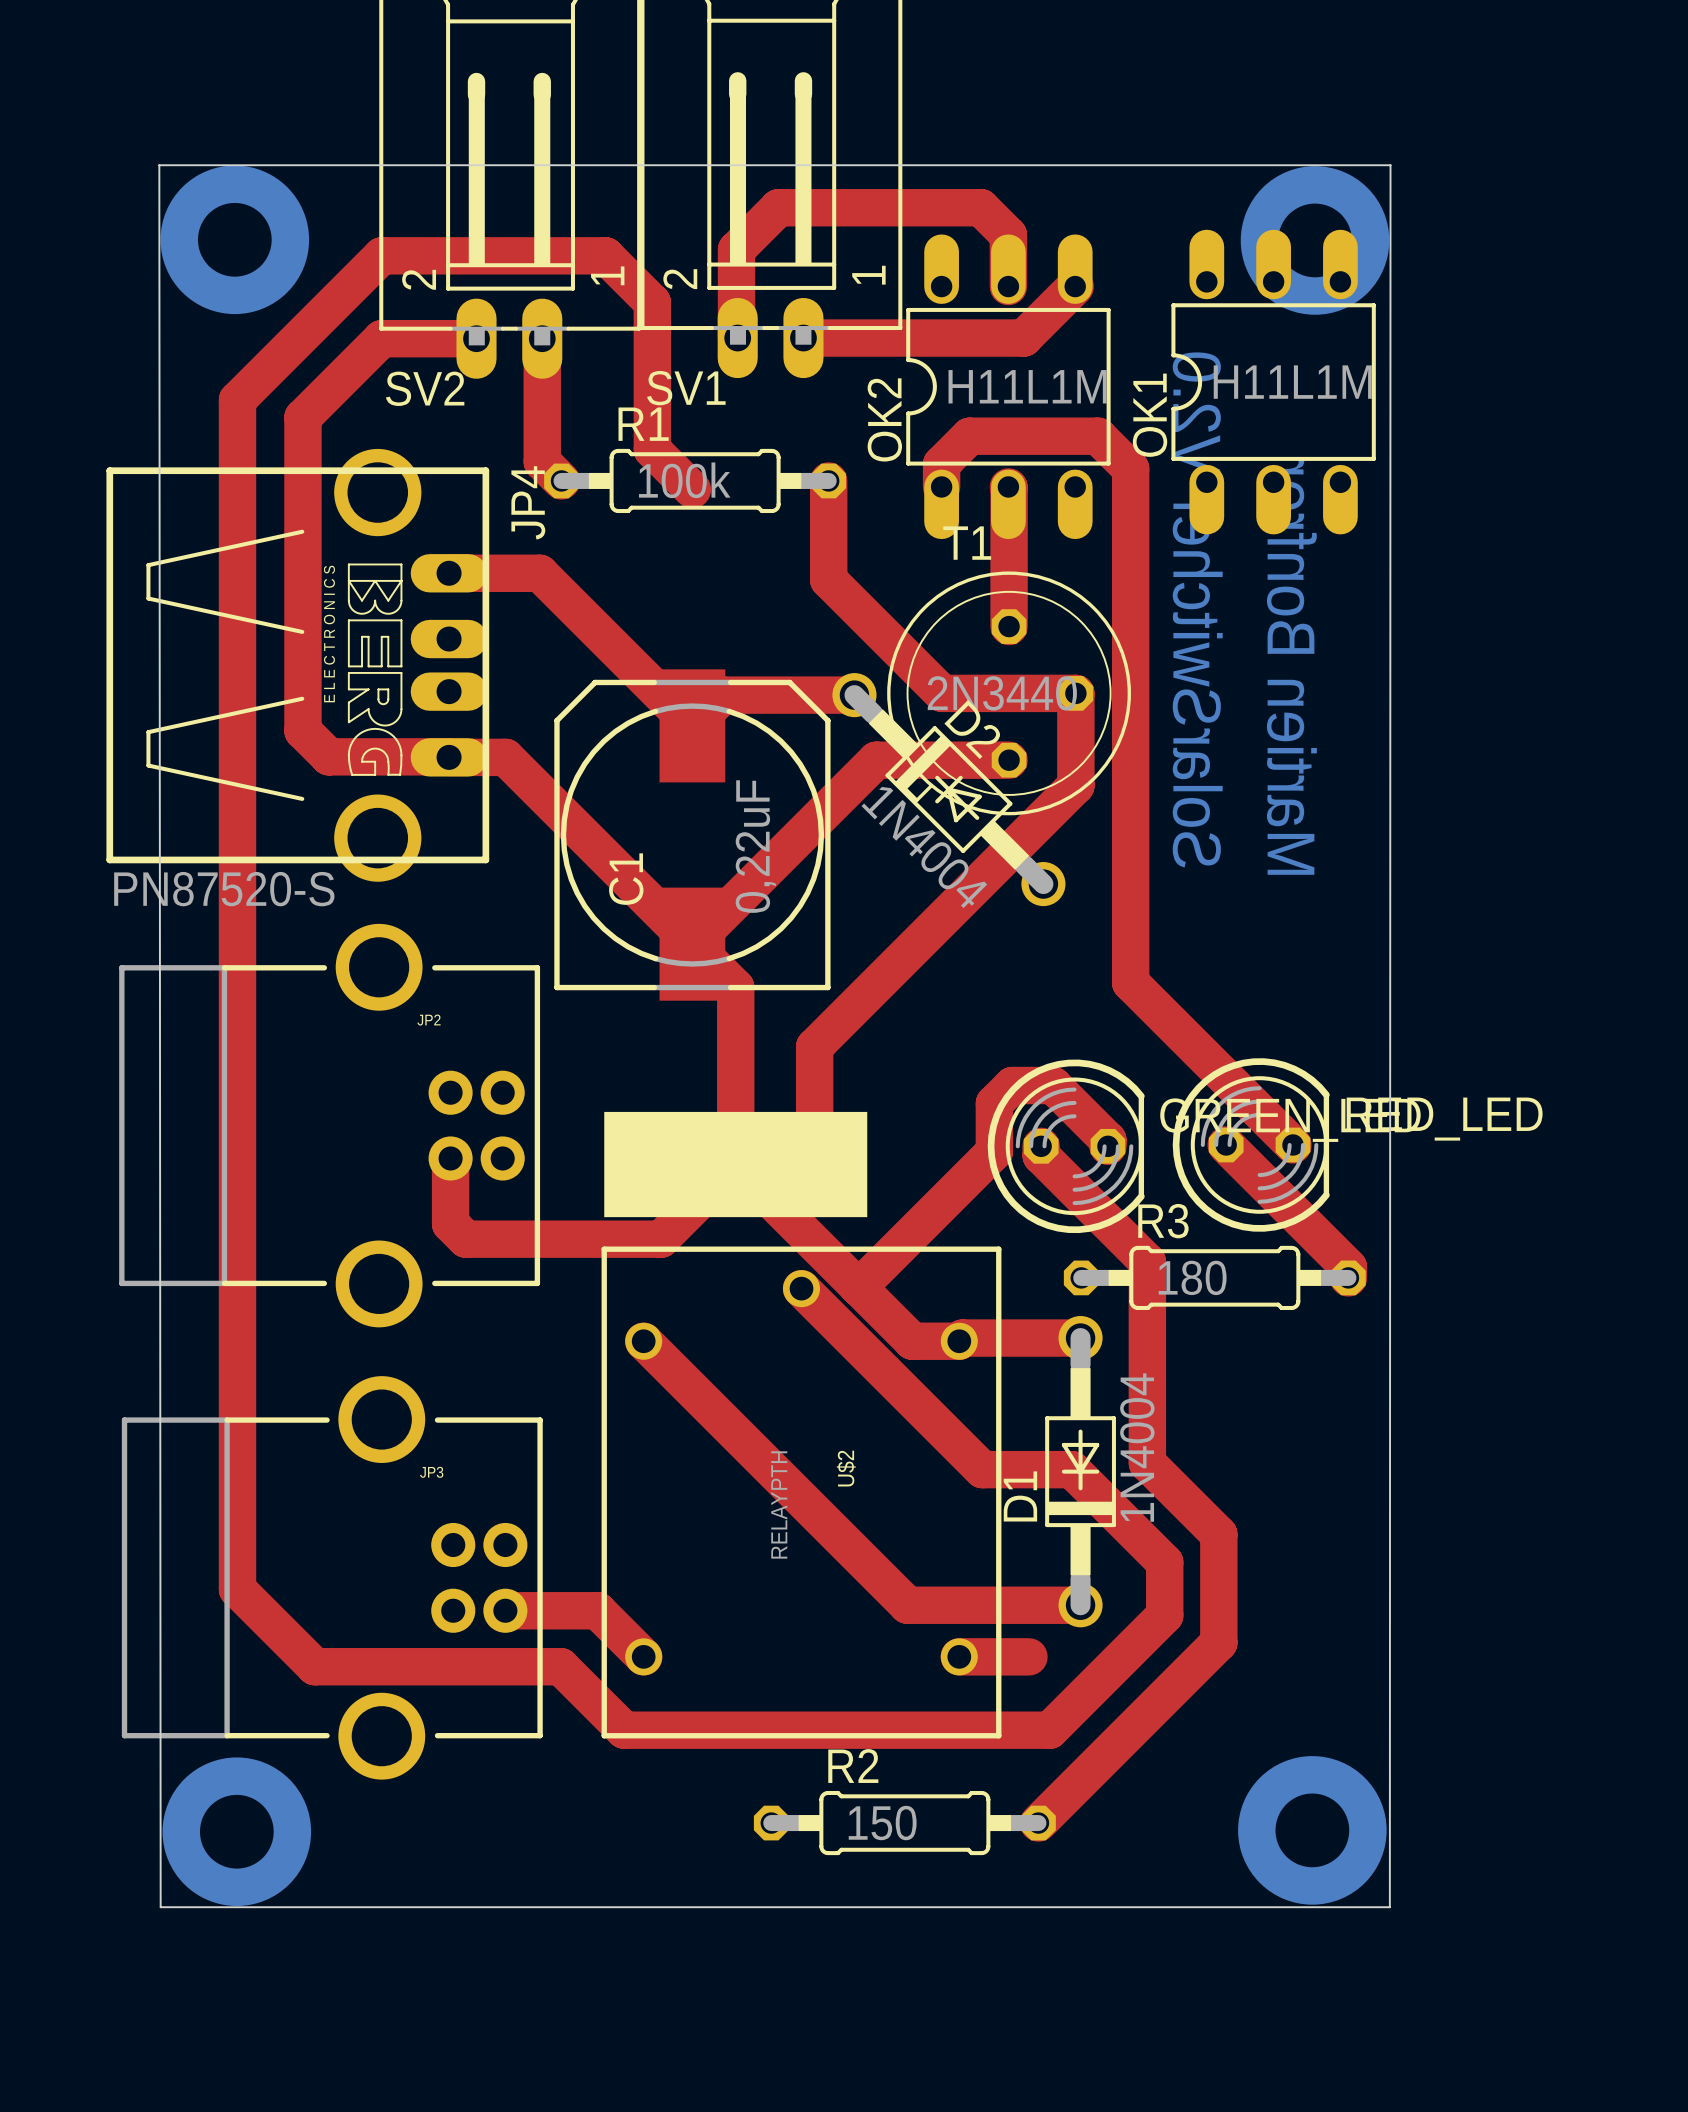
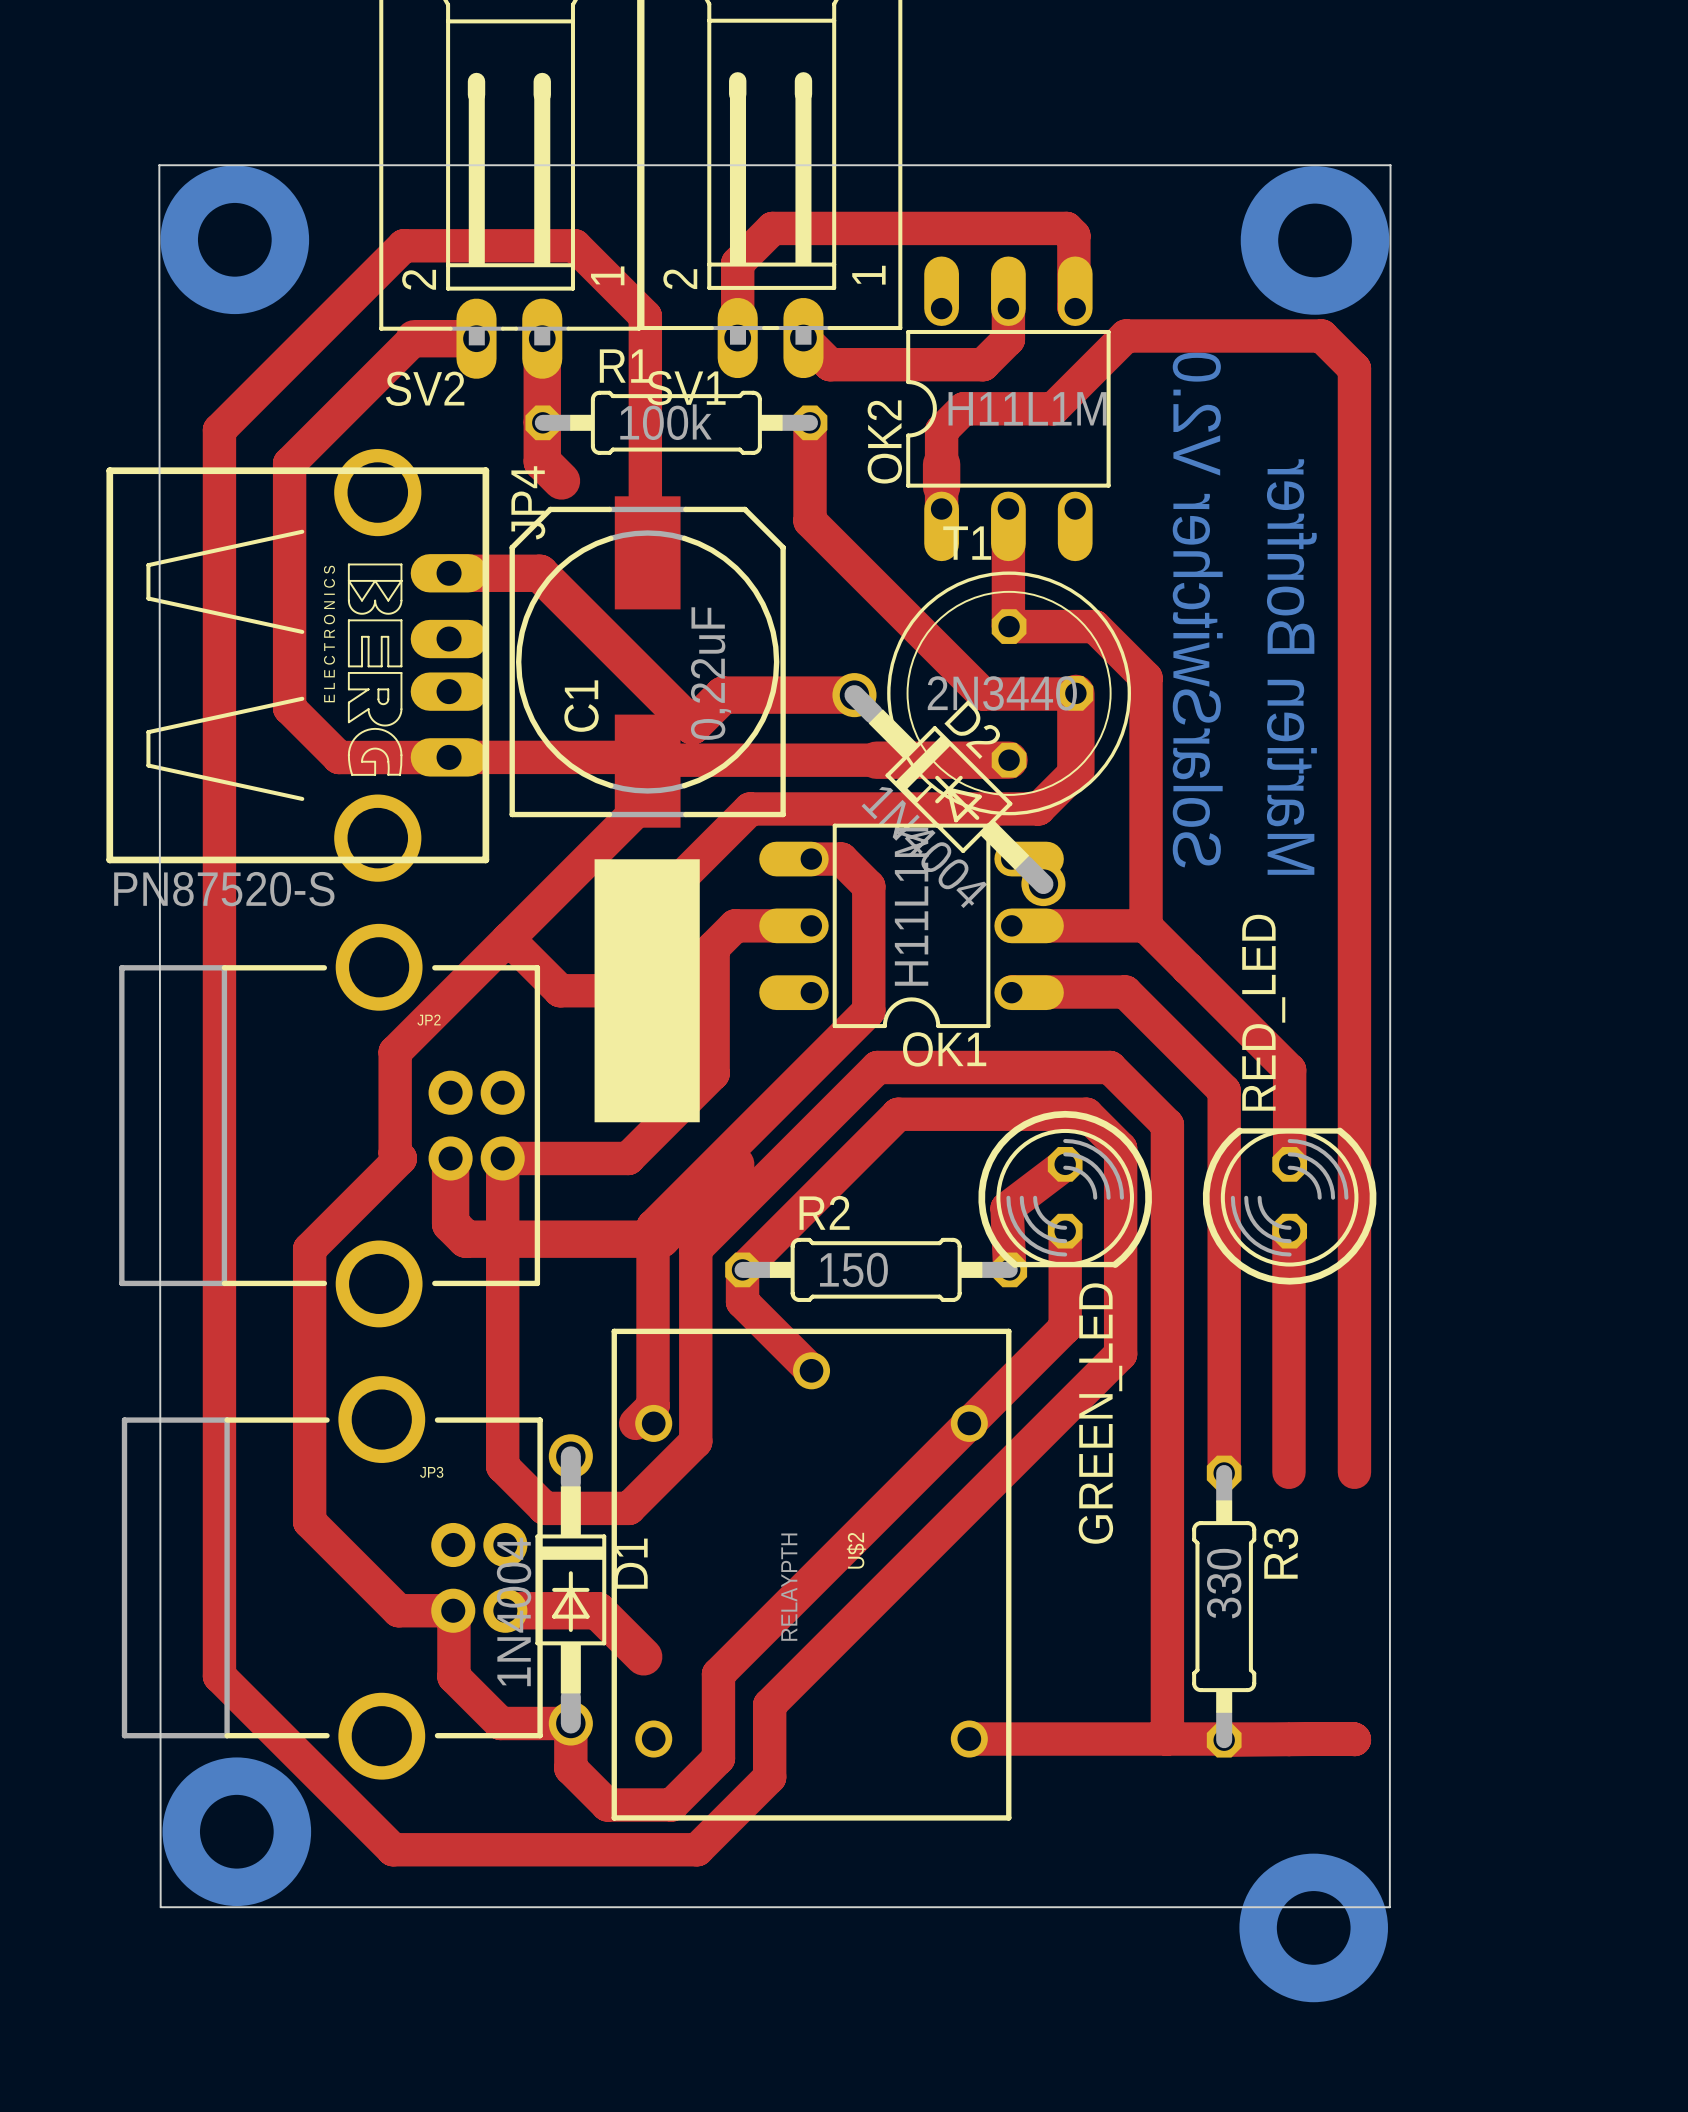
top track: (1008, 286) (1008, 235) (981, 207) (778, 207) (736, 249) (737, 338) -> (1075, 308) (1073, 235) (1066, 228) (772, 228) (737, 263) (737, 338)
top track: (1075, 286) (1023, 338) (803, 338) -> (1008, 308) (1008, 339) (983, 364) (830, 364) (803, 338)
top track: (414, 338) (381, 338) (302, 417) (302, 730) (329, 756) (505, 757) (735, 987) (735, 1164) (912, 1341) (959, 1341) (962, 1338) (1080, 1338) -> (414, 338) (289, 463) (289, 708) (339, 757) (655, 757) (658, 760)
OK1 rotation: 0° (1273, 382) -> 90° counterclockwise (911, 925)
OK1 position: (1273, 382) -> (911, 925)
OK2 position: (1008, 386) -> (1008, 408)
top track: (941, 464) (969, 436) (1097, 436) (1130, 468) (1130, 982) (1292, 1144) -> (941, 464) (941, 430) (963, 408) (1053, 408) (1125, 335) (1321, 335) (1354, 368) (1354, 1472)
R1 position: (695, 480) -> (676, 422)
top track: (828, 480) (828, 579) (942, 693) (1075, 693) -> (810, 422) (810, 521) (983, 694) (1075, 693)
top track: (1008, 486) (1009, 626) -> none
top track: (692, 489) (652, 449) (652, 302) (605, 255) (381, 255) (237, 400) (237, 1589) (314, 1666) (560, 1666) (624, 1730) (1049, 1730) (1164, 1615) (1164, 1562) (1071, 1469) (982, 1469) (801, 1288) -> none
top track: none -> (1008, 509) (1008, 625) (1094, 626) (1146, 678) (1146, 926)
top track: none -> (645, 565) (645, 316) (574, 245) (403, 245) (219, 430) (219, 1676) (393, 1849) (697, 1849) (769, 1777) (769, 1705) (1120, 1354) (1120, 1148) (1086, 1114) (898, 1114) (742, 1269) (742, 1301) (811, 1370)
top track: none -> (658, 760) (647, 771) (647, 799) (395, 1052) (395, 1153) (400, 1158) (309, 1249) (309, 1521) (398, 1610) (453, 1611) (453, 1676) (500, 1723) (570, 1723)
top track: (876, 760) (692, 944) -> (876, 760) (658, 760)
top track: (1075, 771) (1075, 785) (814, 1046) (814, 1164) -> (1075, 771) (1038, 808) (750, 808) (647, 911)
C1 position: (692, 835) -> (647, 661)
top track: none -> (811, 859) (841, 859) (868, 886) (868, 1010) (653, 1226) (653, 1406) (635, 1423)
top track: none -> (811, 925) (735, 925) (713, 947) (713, 1073) (628, 1158) (502, 1158) (502, 1466) (544, 1508) (628, 1508) (695, 1441) (695, 1249) (877, 1067) (1109, 1067) (1167, 1124) (1166, 1739)
top track: none -> (1011, 925) (1145, 925) (1289, 1070) (1289, 1164)
top track: none -> (508, 938) (560, 990) (647, 990)
top track: none -> (1011, 992) (1125, 992) (1224, 1090) (1224, 1472)
top track: (1226, 1144) (1348, 1267) (1348, 1277) -> none
RED_LED rotation: 0° (1251, 1144) -> 90° counterclockwise (1289, 1206)
top track: (1041, 1146) (1041, 1155) (1147, 1261) (1147, 1462) (1218, 1534) (1218, 1642) (1038, 1823) -> none
GREEN_LED rotation: 0° (1066, 1146) -> 90° clockwise (1065, 1189)
top track: (1107, 1146) (1107, 1140) (1053, 1085) (1012, 1085) (994, 1103) (994, 1151) (858, 1287) -> none
part rotation: 0° (735, 1164) -> 90° clockwise (647, 990)
part position: (735, 1164) -> (647, 990)
top track: none -> (1065, 1164) (1007, 1208) (1009, 1269)
top track: none -> (1065, 1231) (1065, 1327) (718, 1674) (718, 1758) (671, 1805) (607, 1805) (570, 1768) (570, 1723)
top track: none -> (1289, 1231) (1288, 1472)
R3 value: 180 (1192, 1277) -> 330 (1224, 1583)
R3 rotation: 0° (1214, 1277) -> 90° clockwise (1224, 1606)
R3 position: (1214, 1277) -> (1224, 1606)
top track: (643, 1341) (907, 1605) (1080, 1605) -> none
D1 rotation: 0° (1080, 1471) -> 180° (570, 1589)
D1 position: (1080, 1471) -> (570, 1589)
U$2 position: (801, 1492) -> (811, 1574)
top track: (959, 1656) (1028, 1656) -> none
top track: none -> (969, 1739) (1353, 1739) (1354, 1739) (1224, 1740)
R2 position: (904, 1823) -> (876, 1269)
drawing position: (1312, 1830) -> (1313, 1927)

